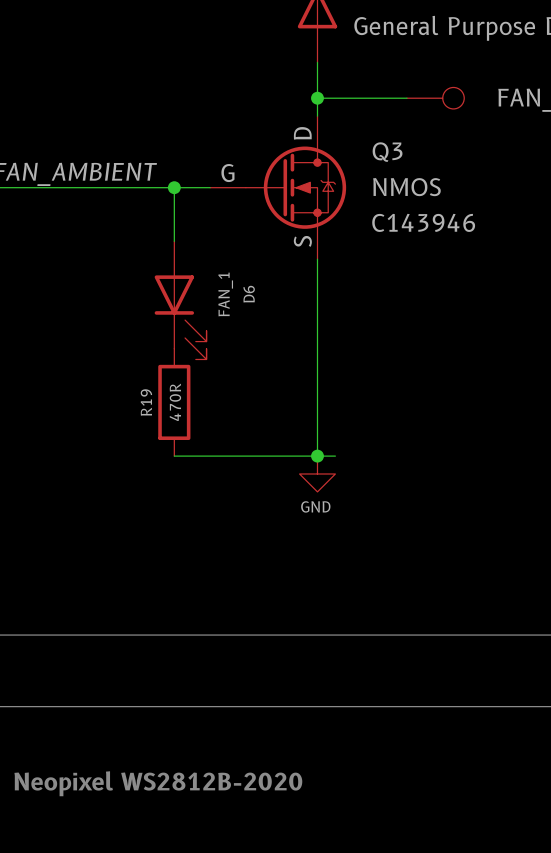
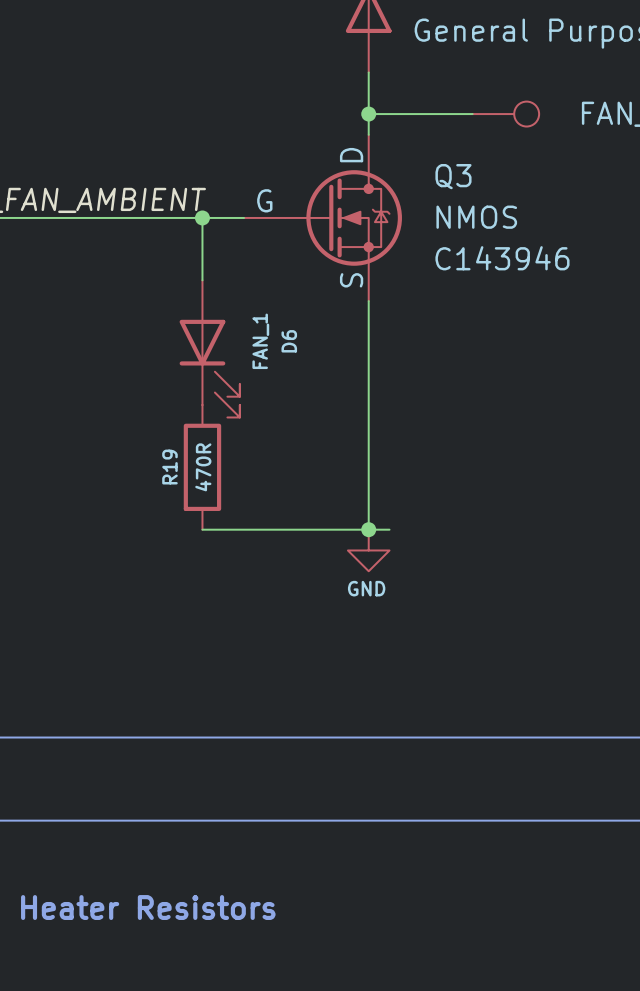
text: Neopixel WS2812B-2020 (158, 783) -> Heater Resistors (148, 907)

